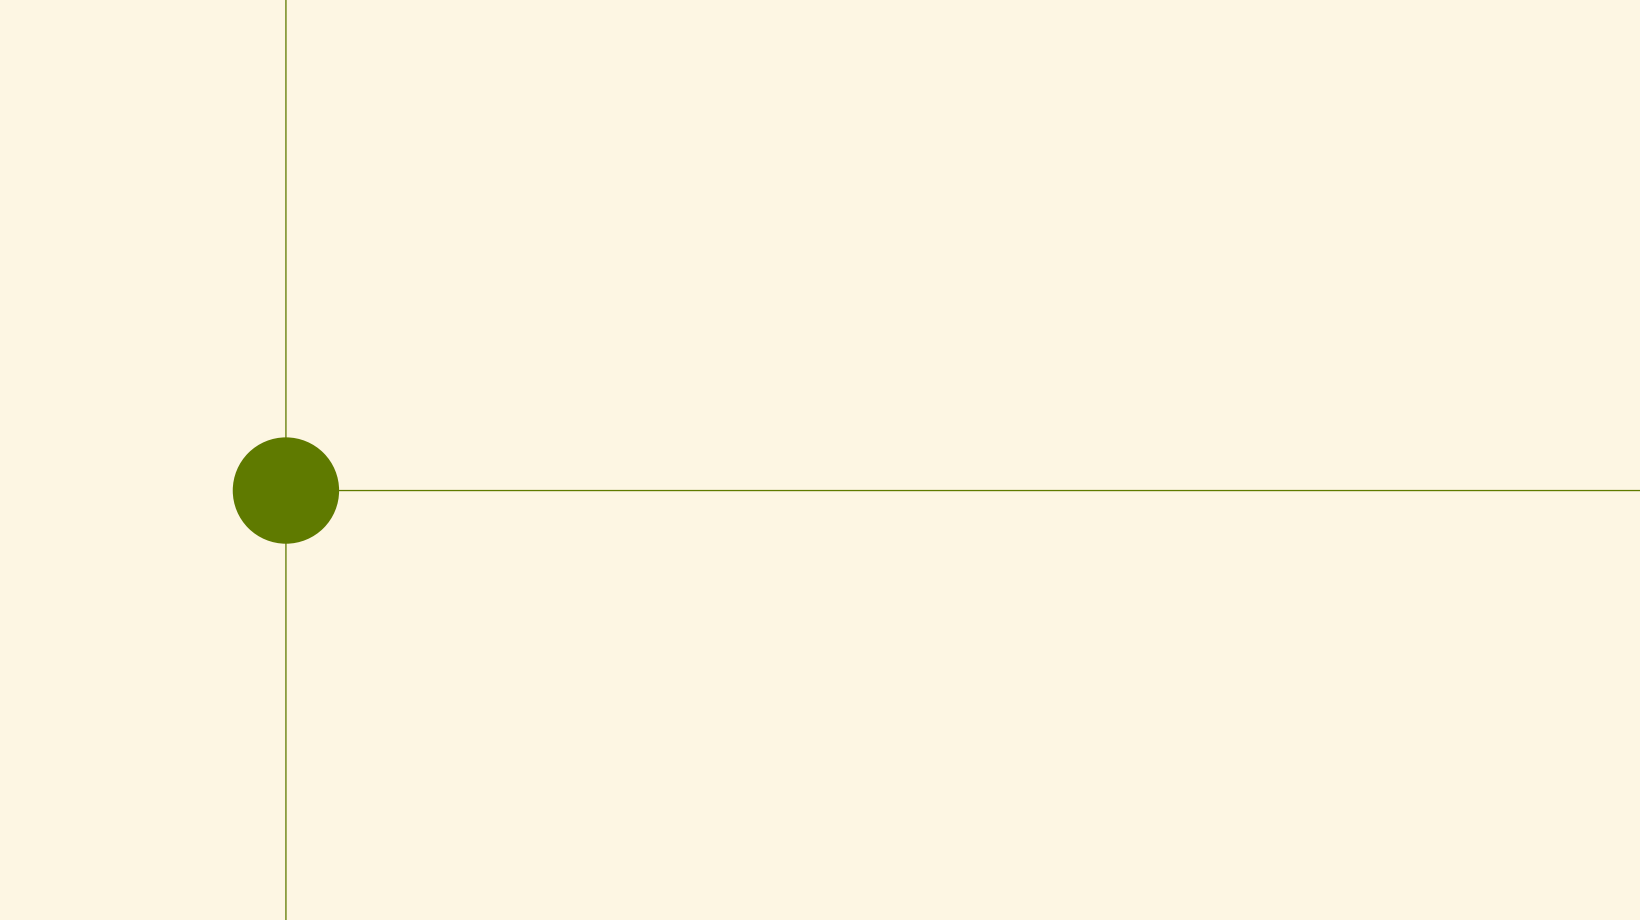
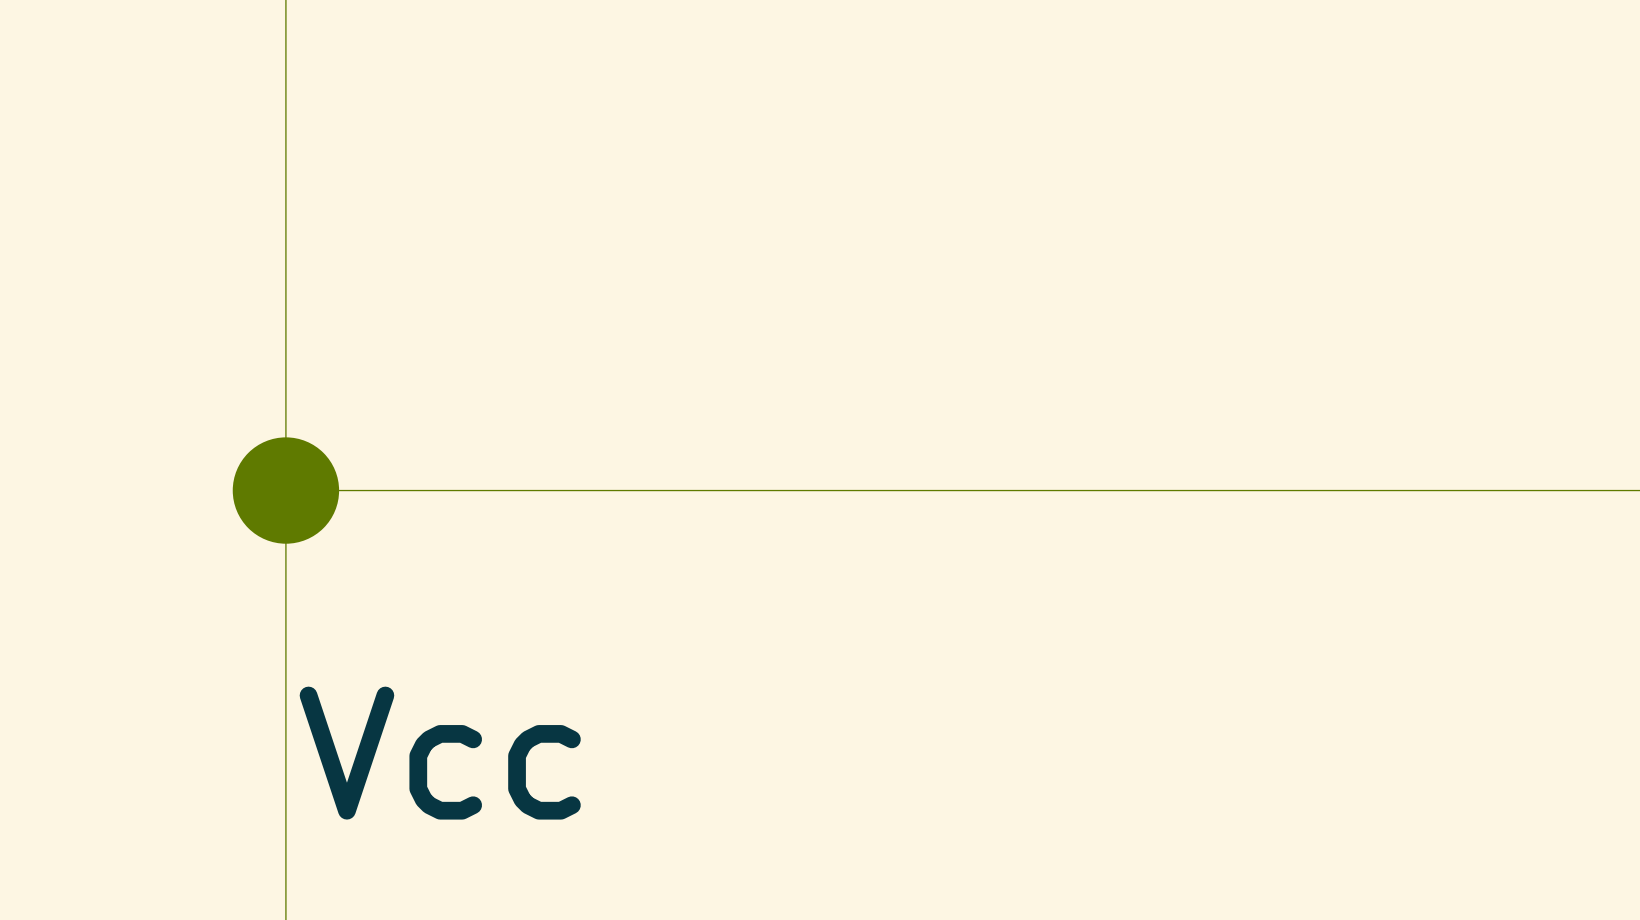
label: none -> Vcc (440, 753)

